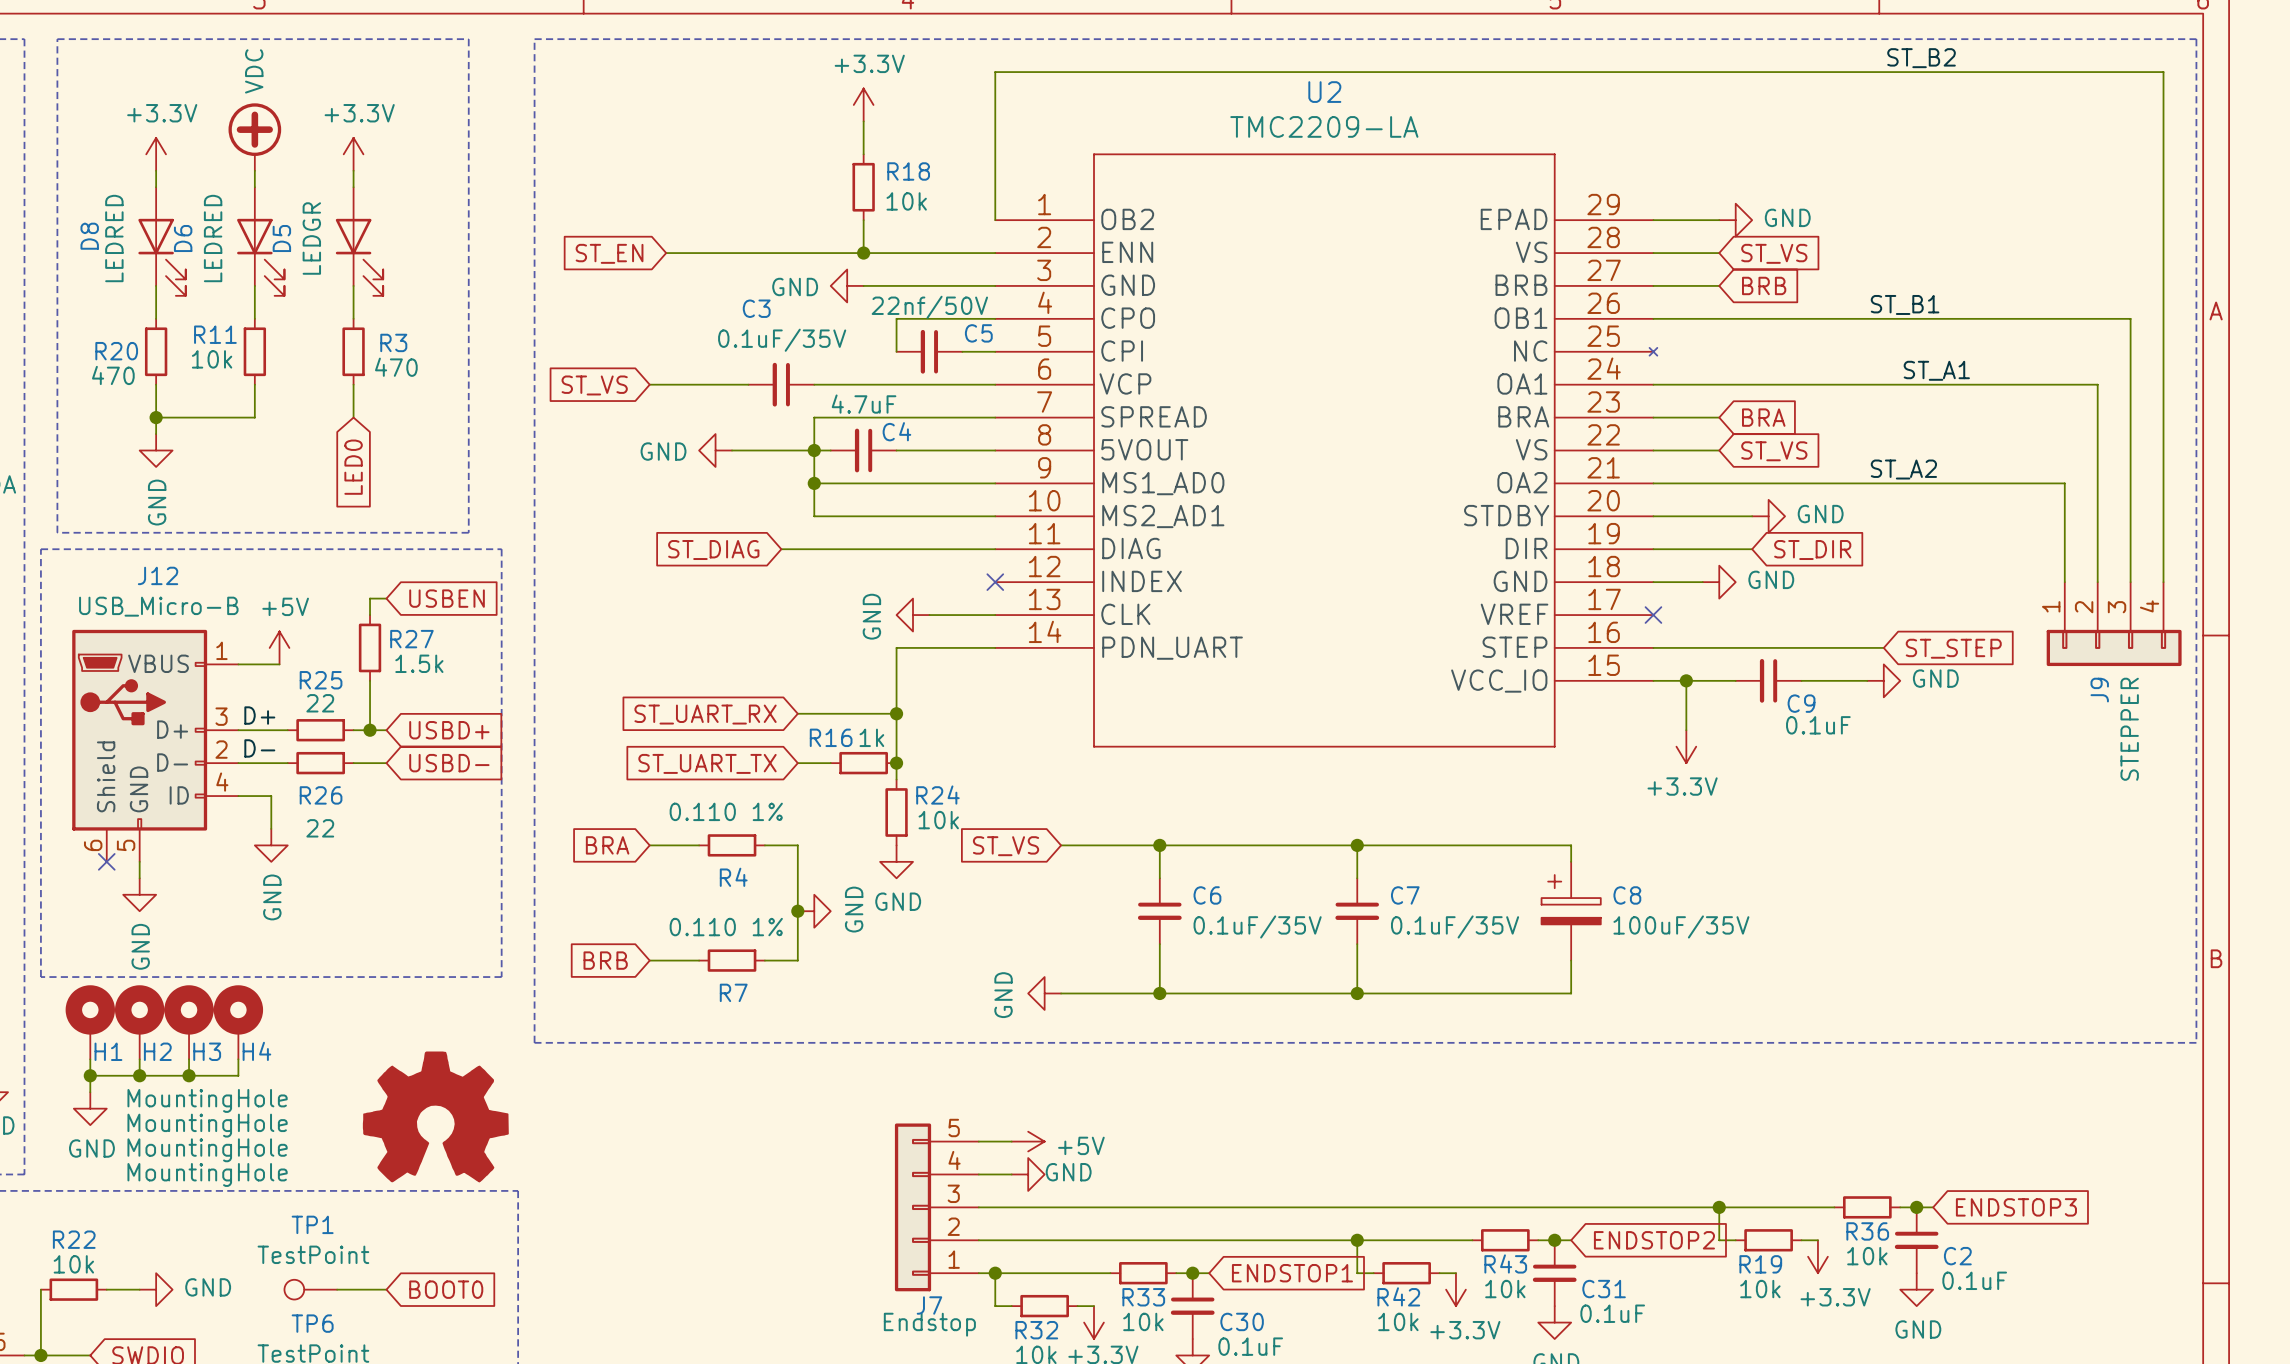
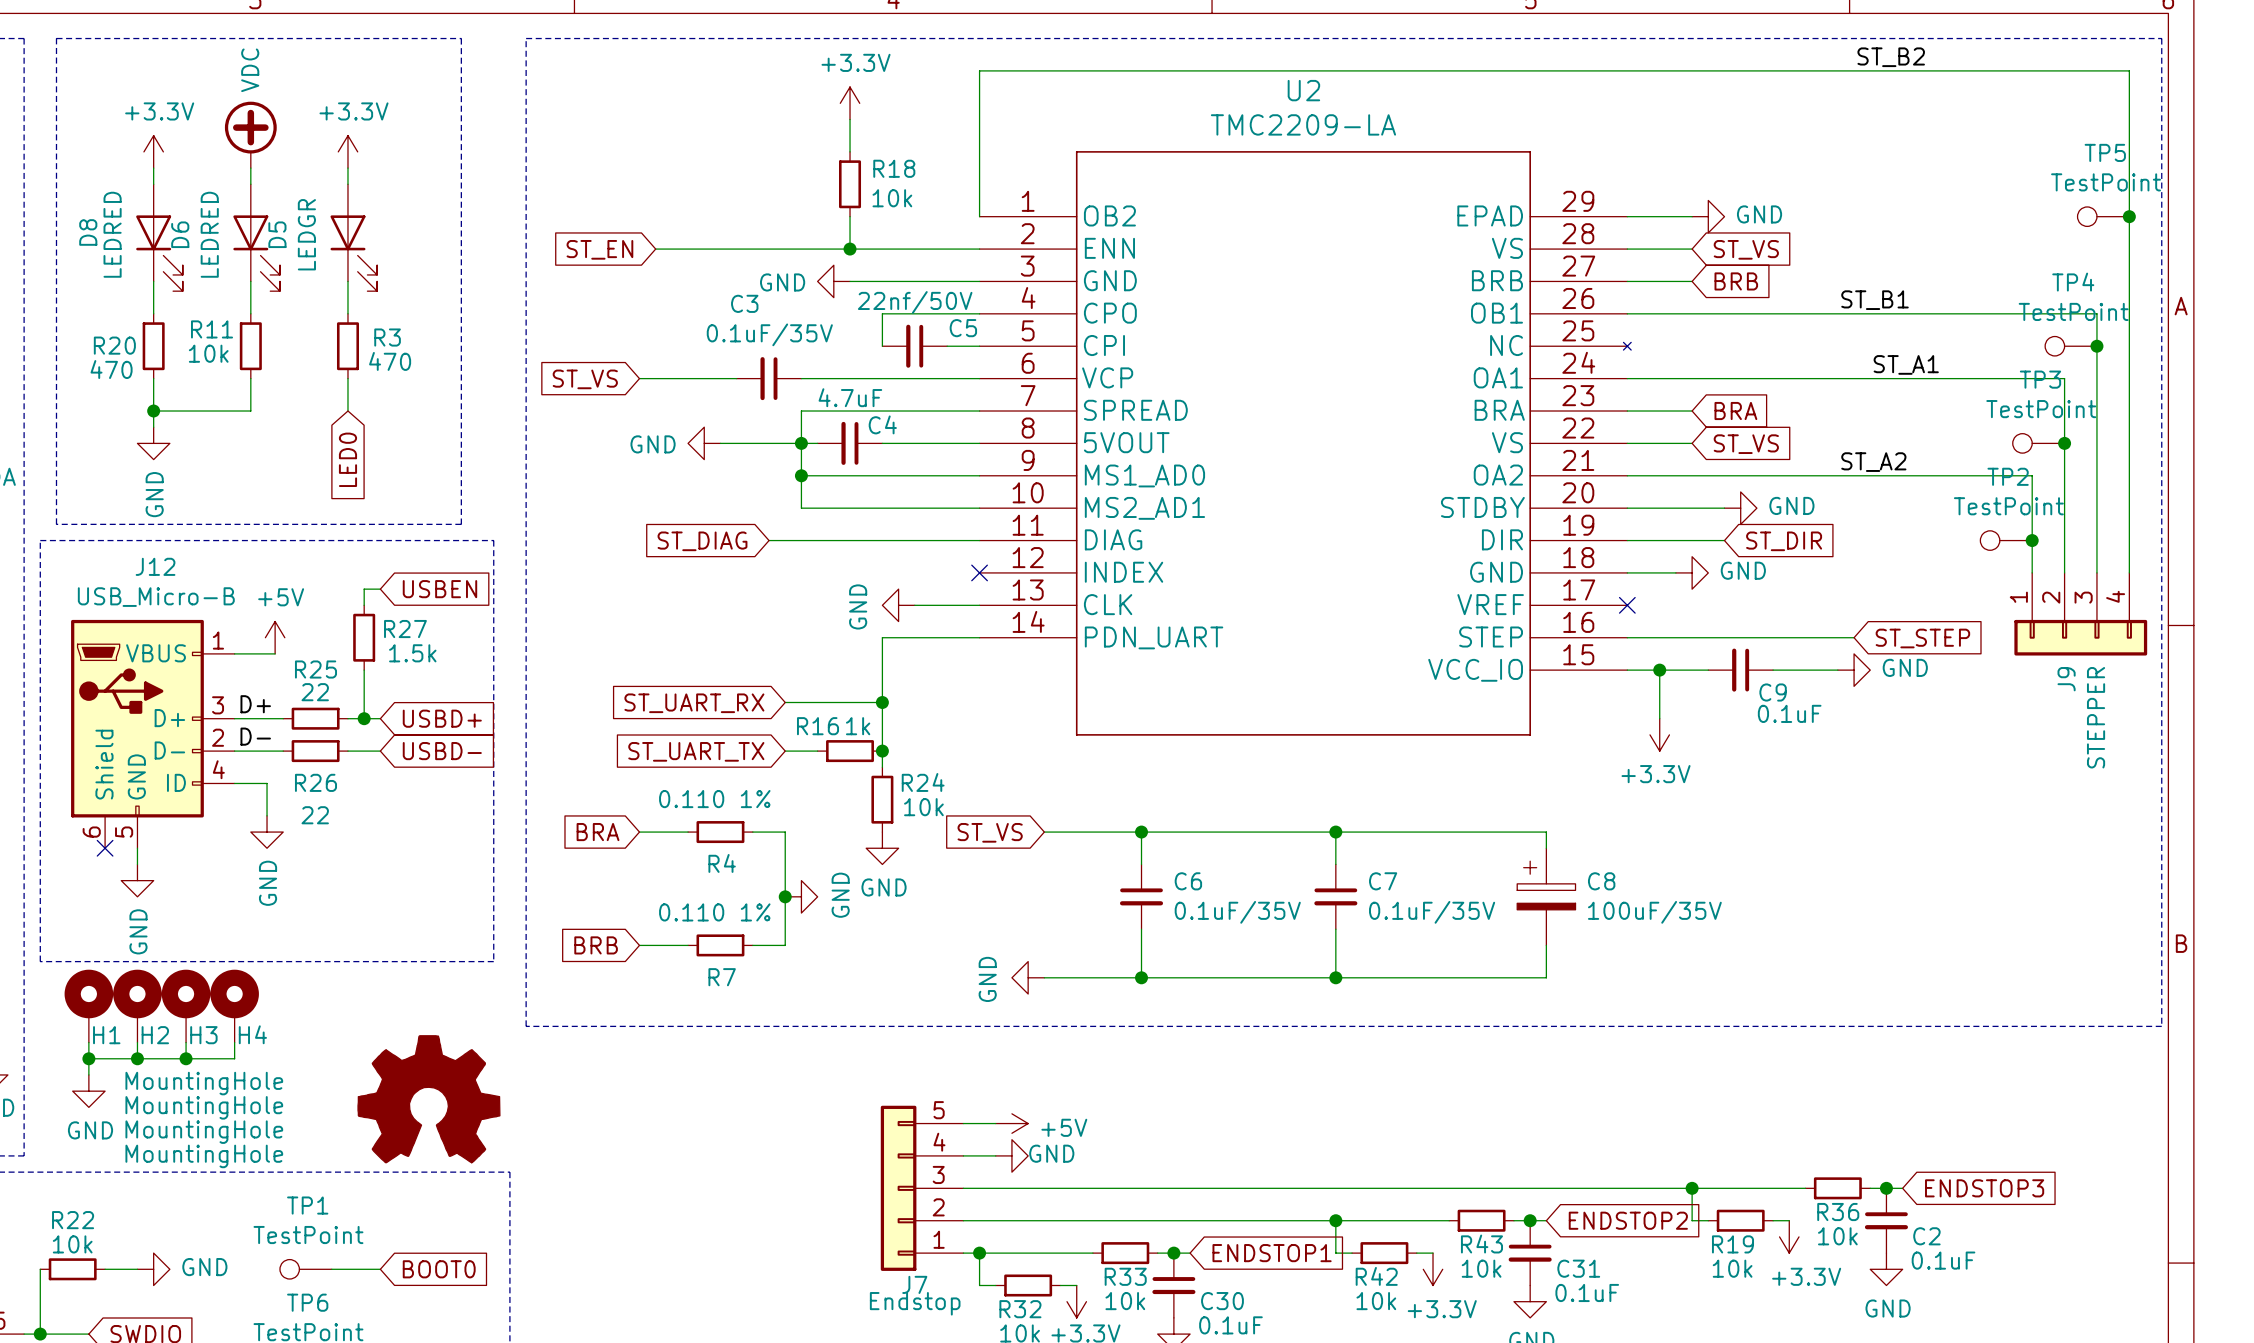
TP5: none -> TestPoint (2103, 216)
junction: none -> (2129, 216)
TP4: none -> TestPoint (2071, 346)
junction: none -> (2096, 346)
TP3: none -> TestPoint (2038, 443)
junction: none -> (2064, 443)
TP2: none -> TestPoint (2006, 540)
junction: none -> (2032, 540)

